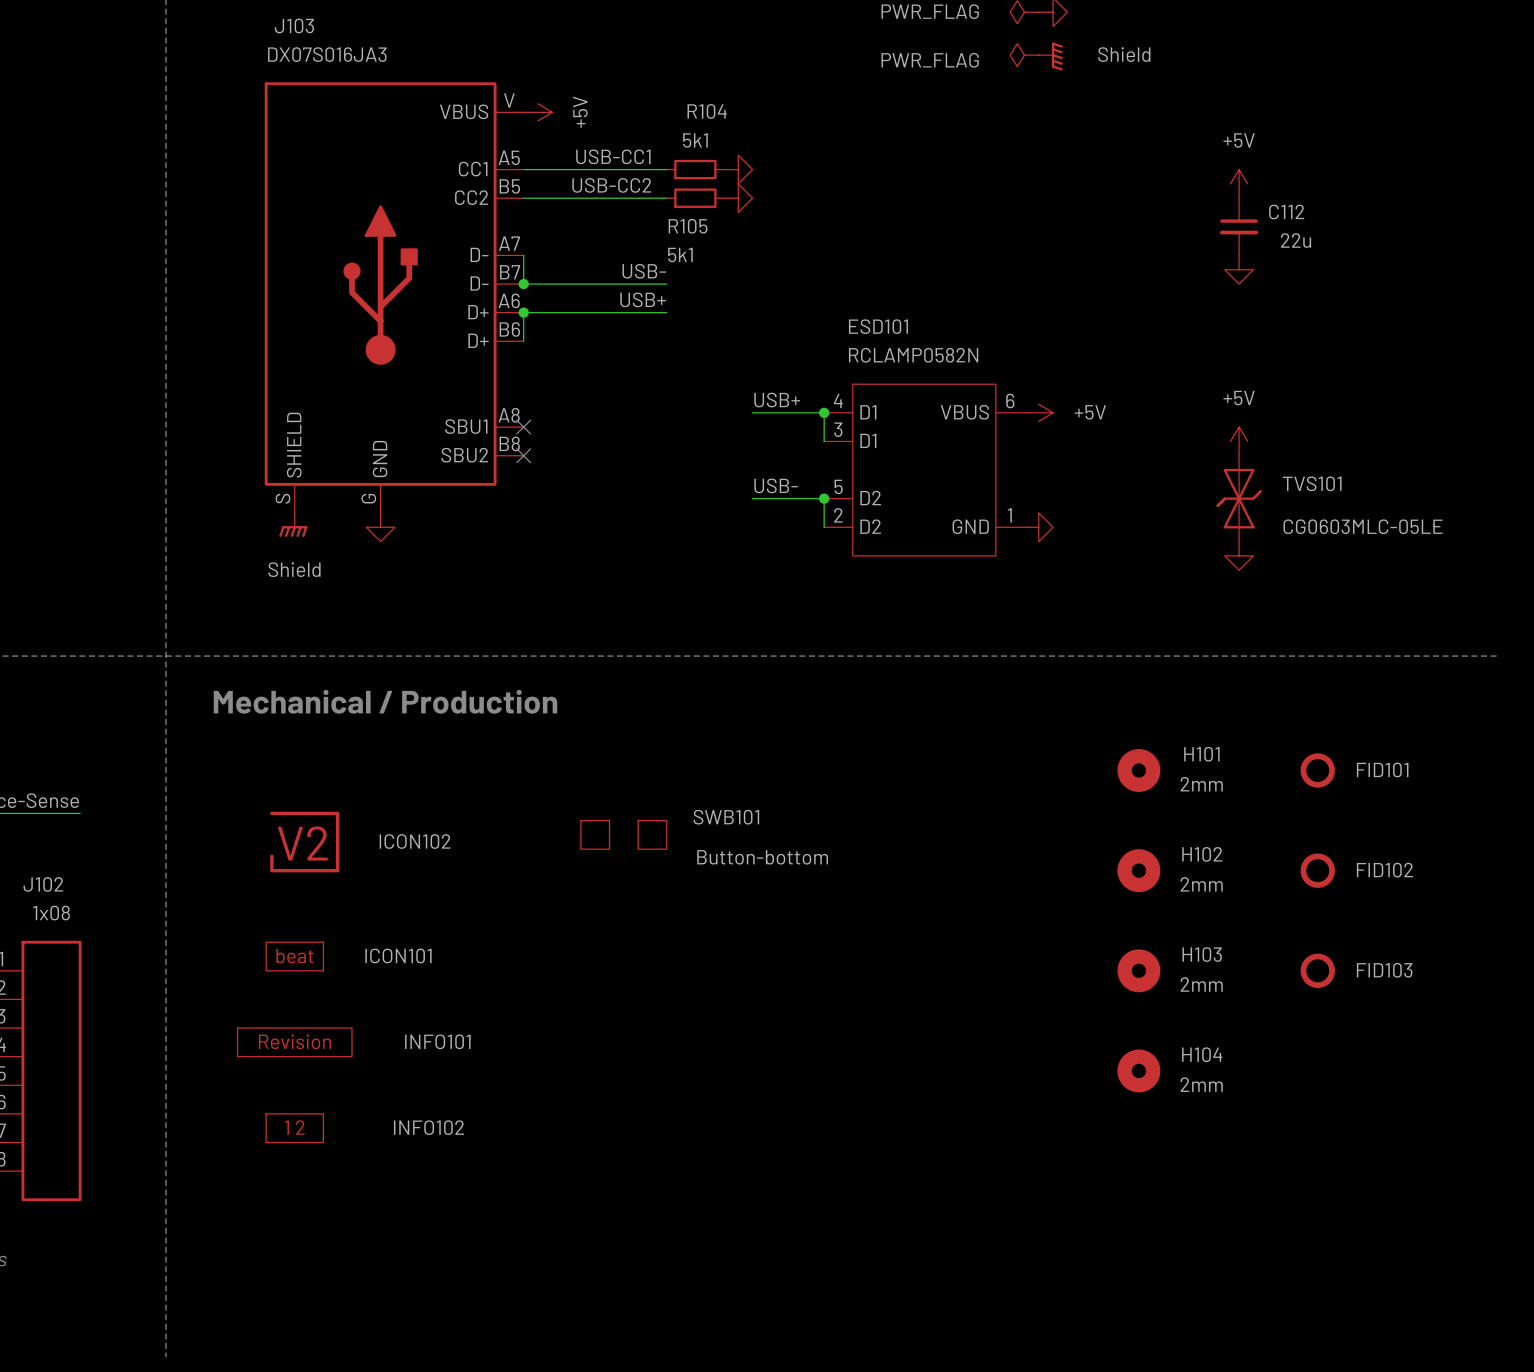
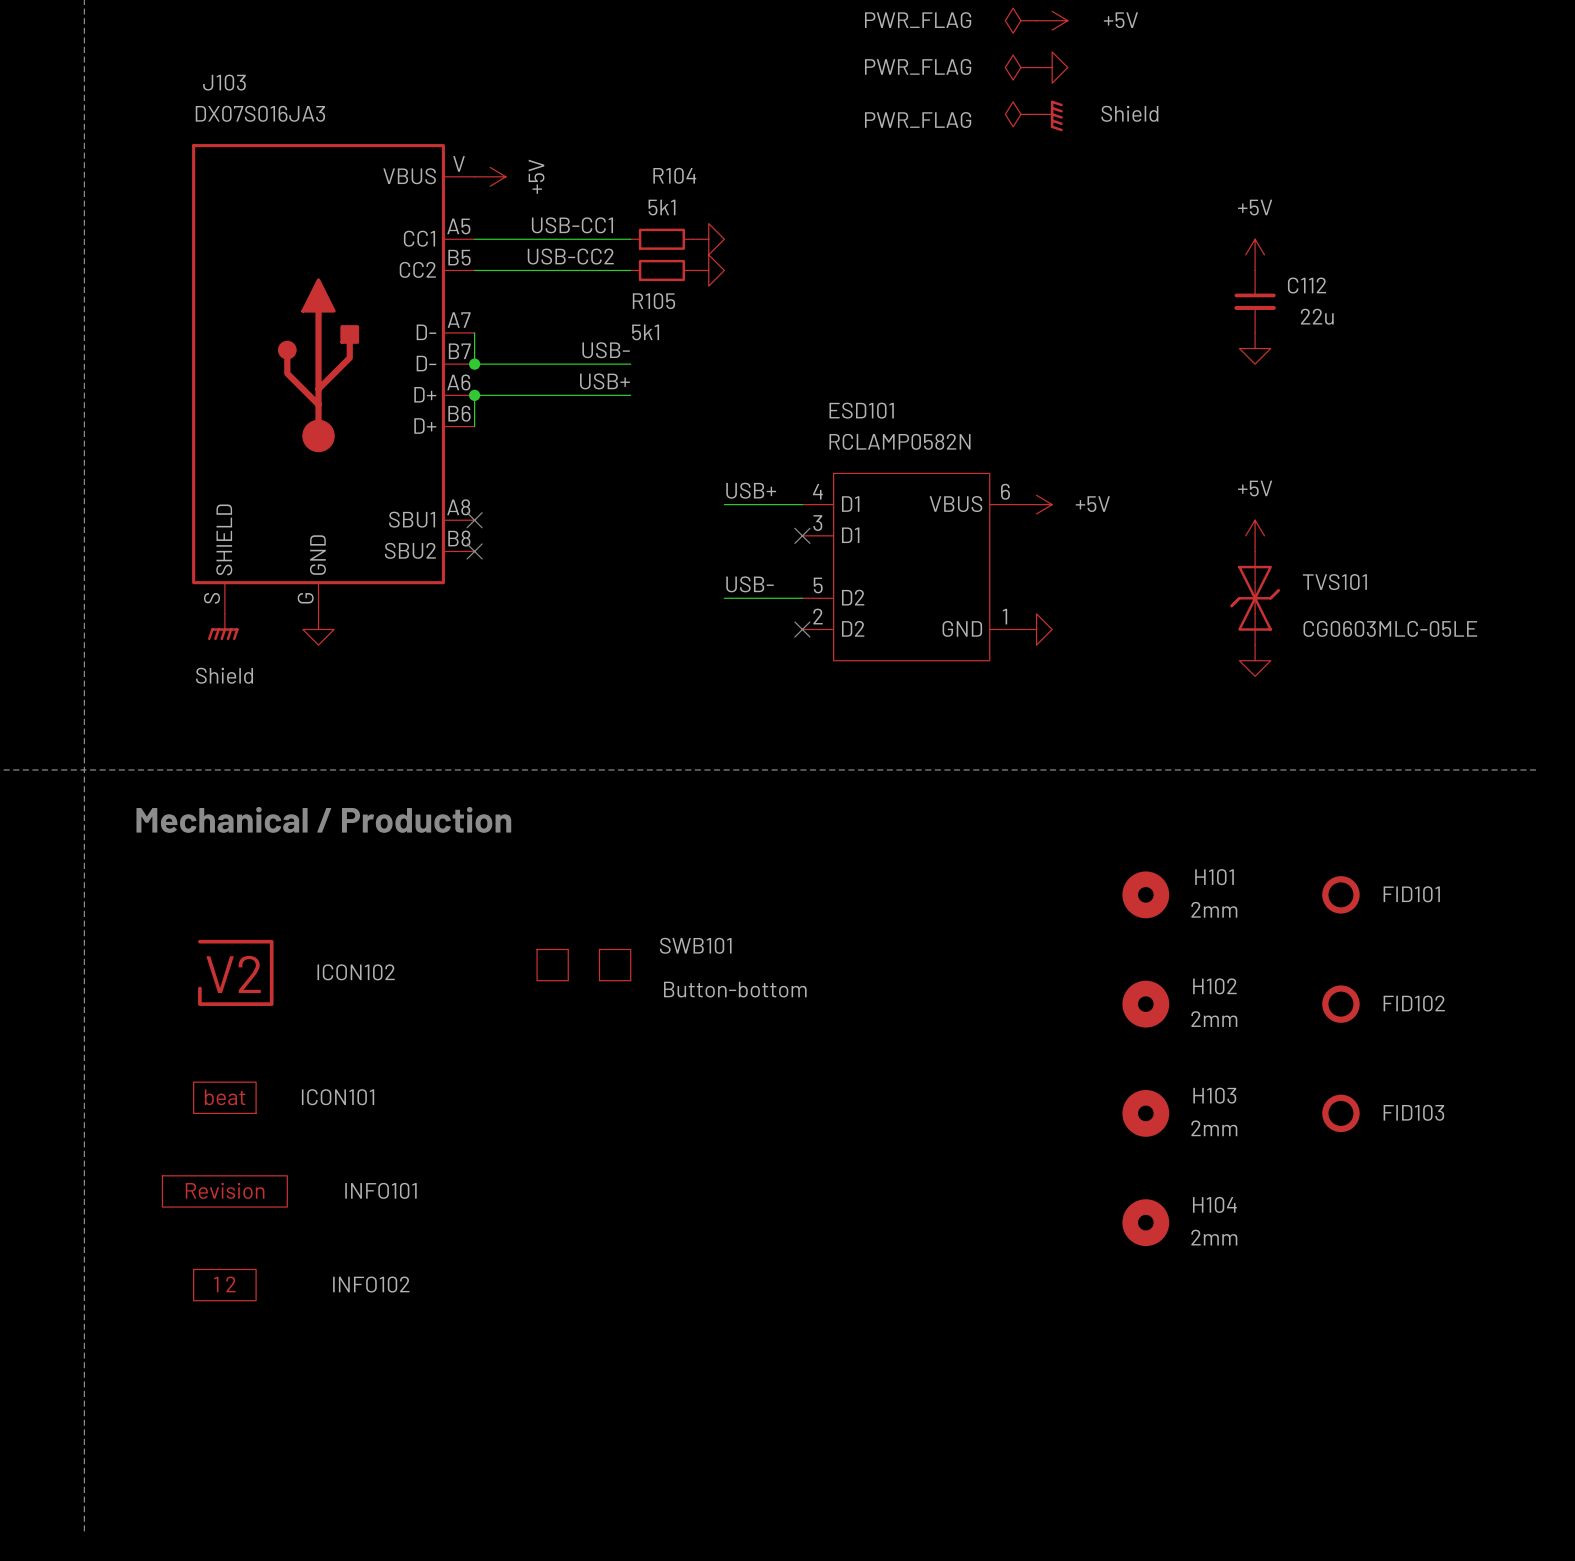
wire: (824, 412) (824, 441) -> none
junction: (824, 412) -> none
no-connect mark: none -> (802, 535)
wire: (824, 498) (824, 527) -> none
junction: (824, 498) -> none
no-connect mark: none -> (802, 629)

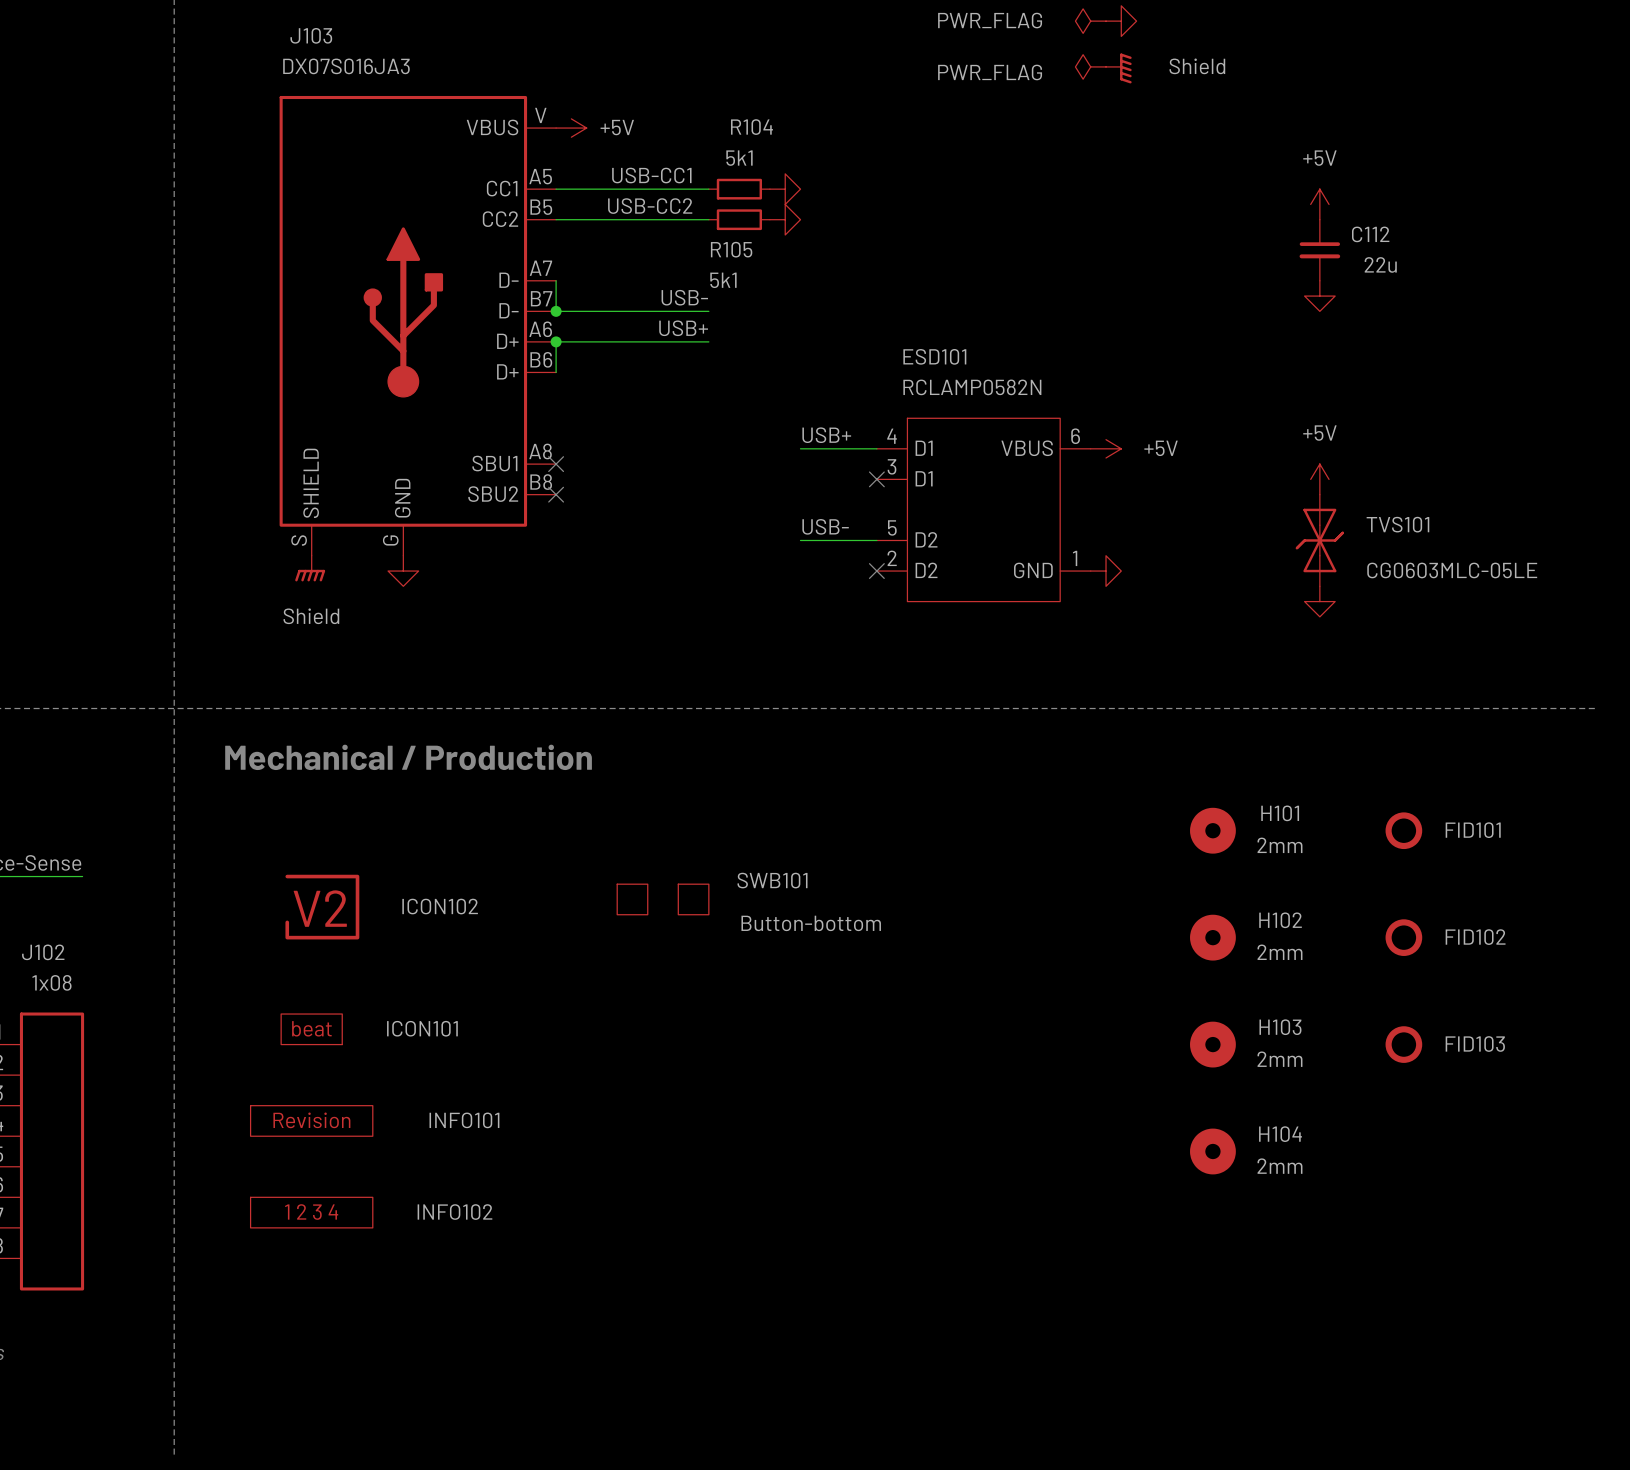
power symbol text rotation: 0° (536, 176) -> 90° clockwise (617, 127)
INFO102 symbol: [193, 1269, 257, 1301] -> [250, 1197, 373, 1228]

